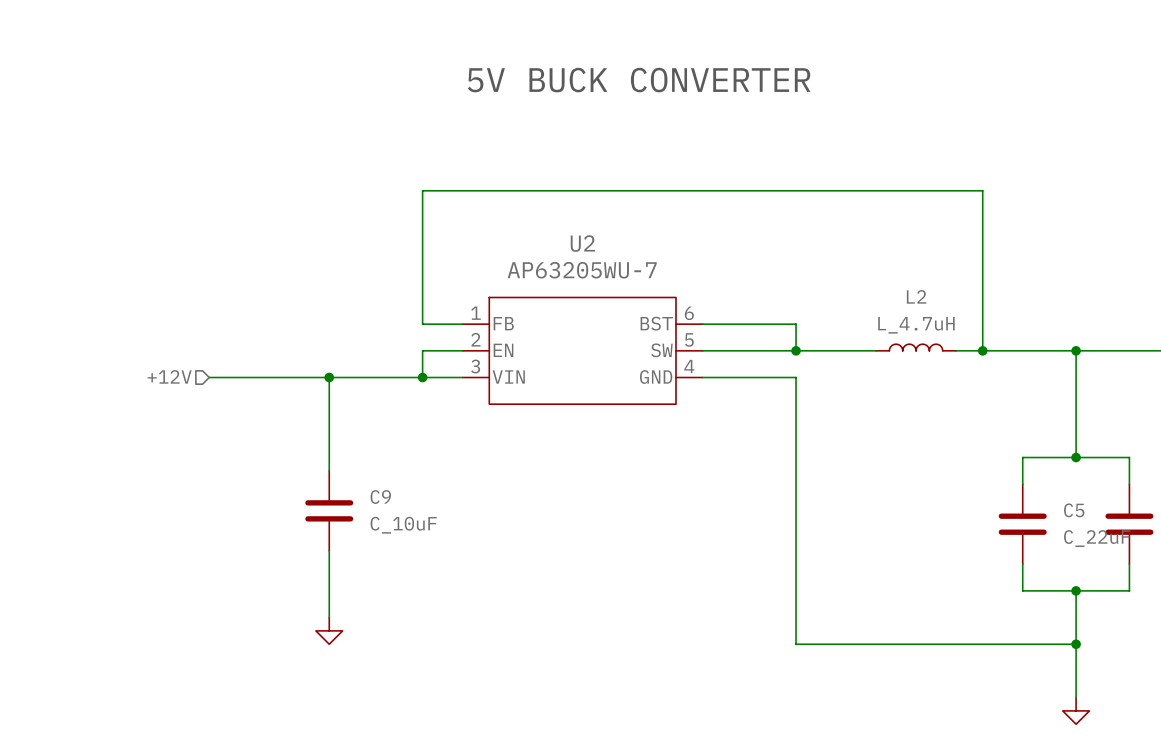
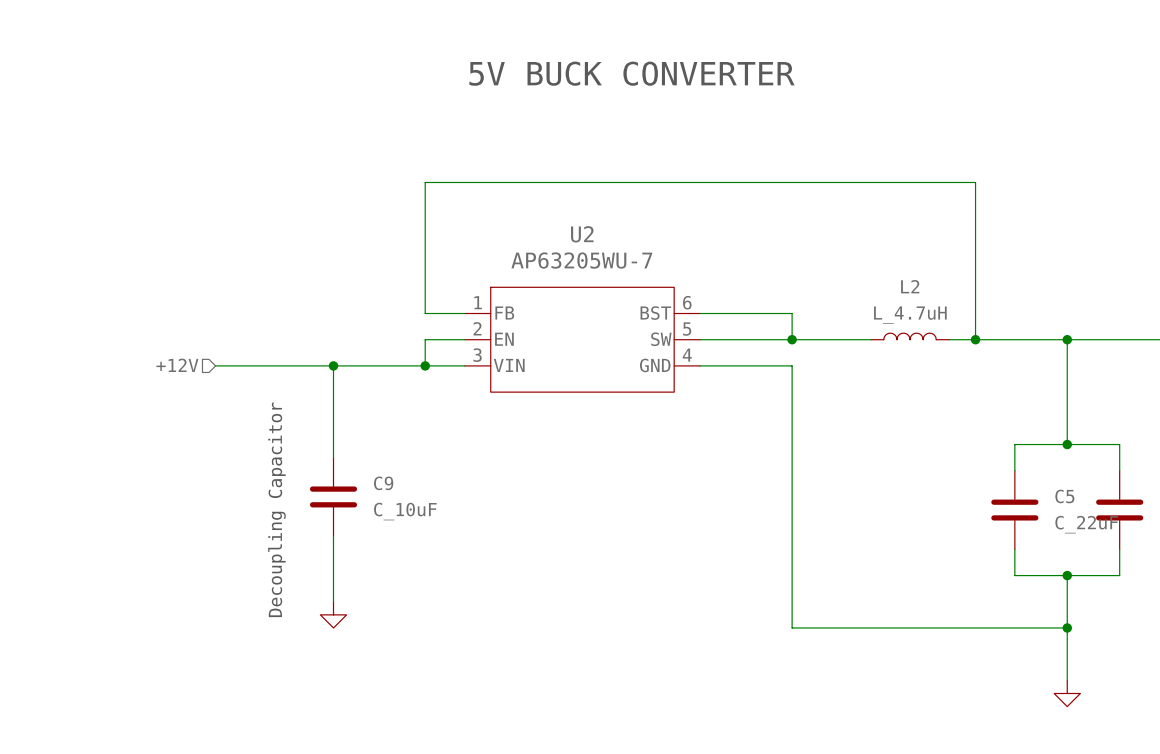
text: none -> Decoupling Capacitor (276, 509)

